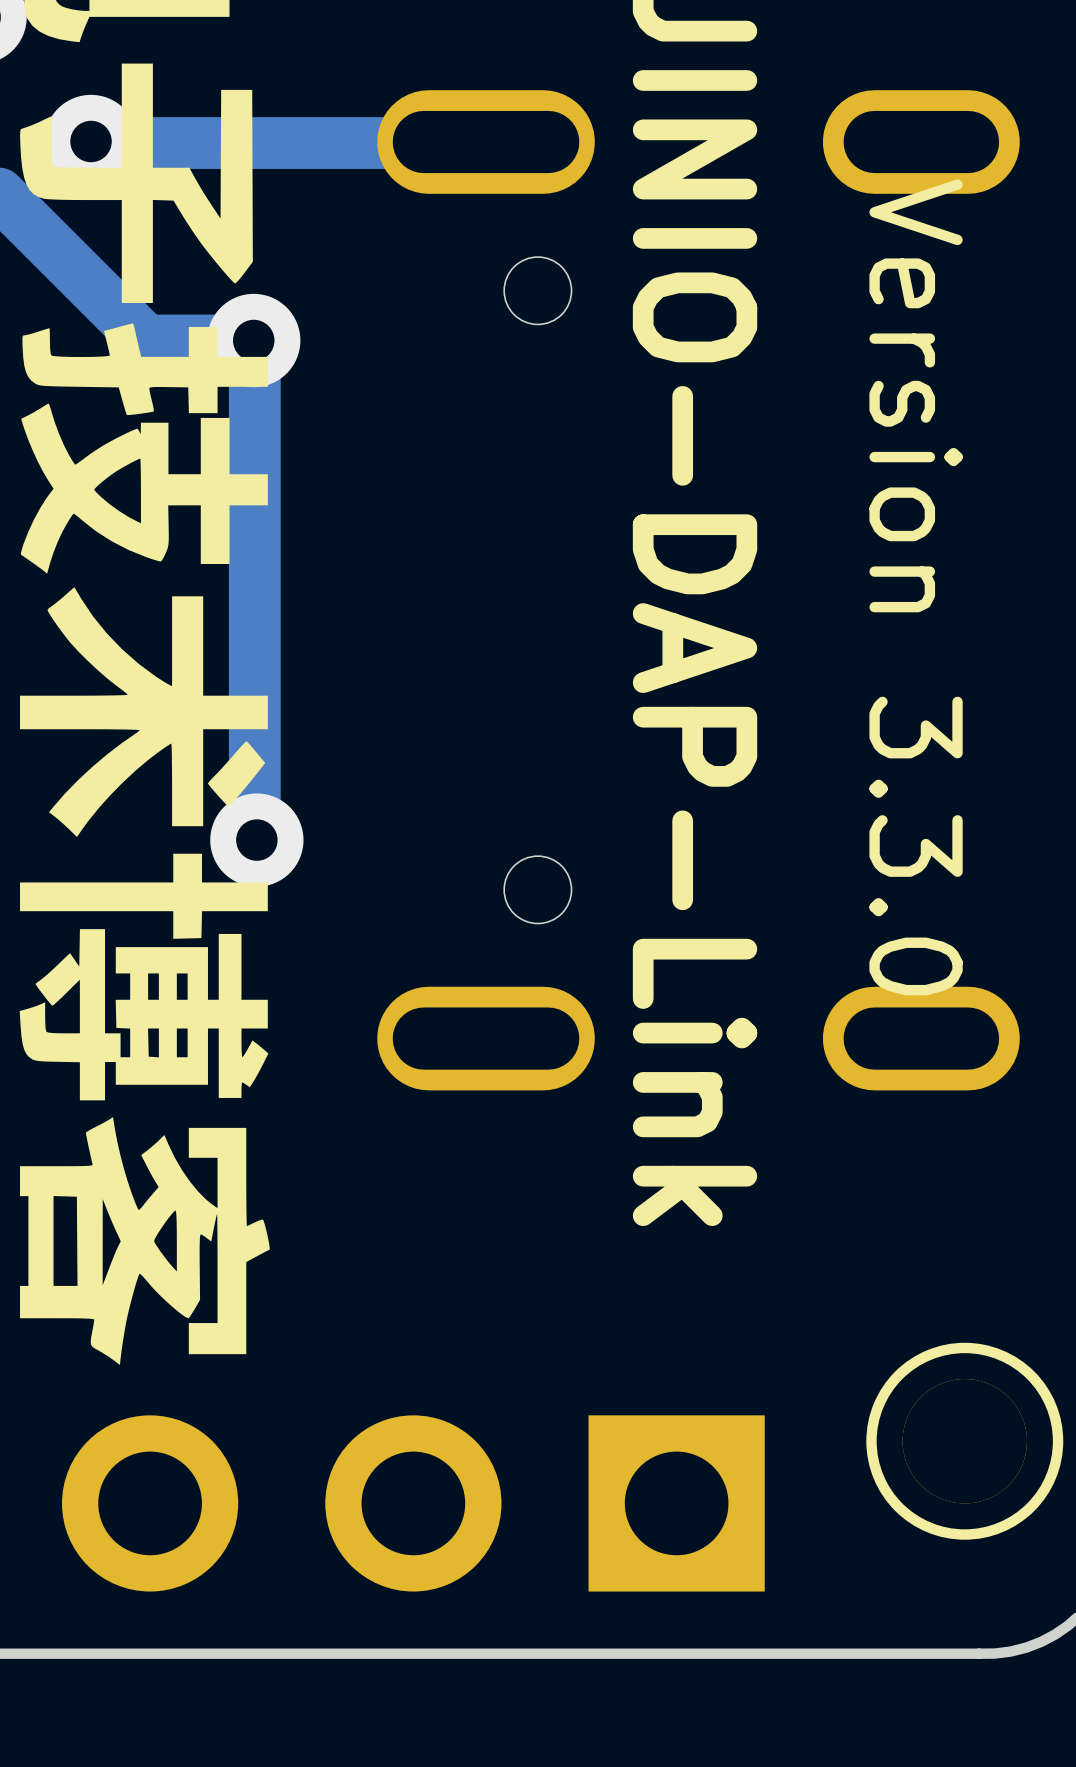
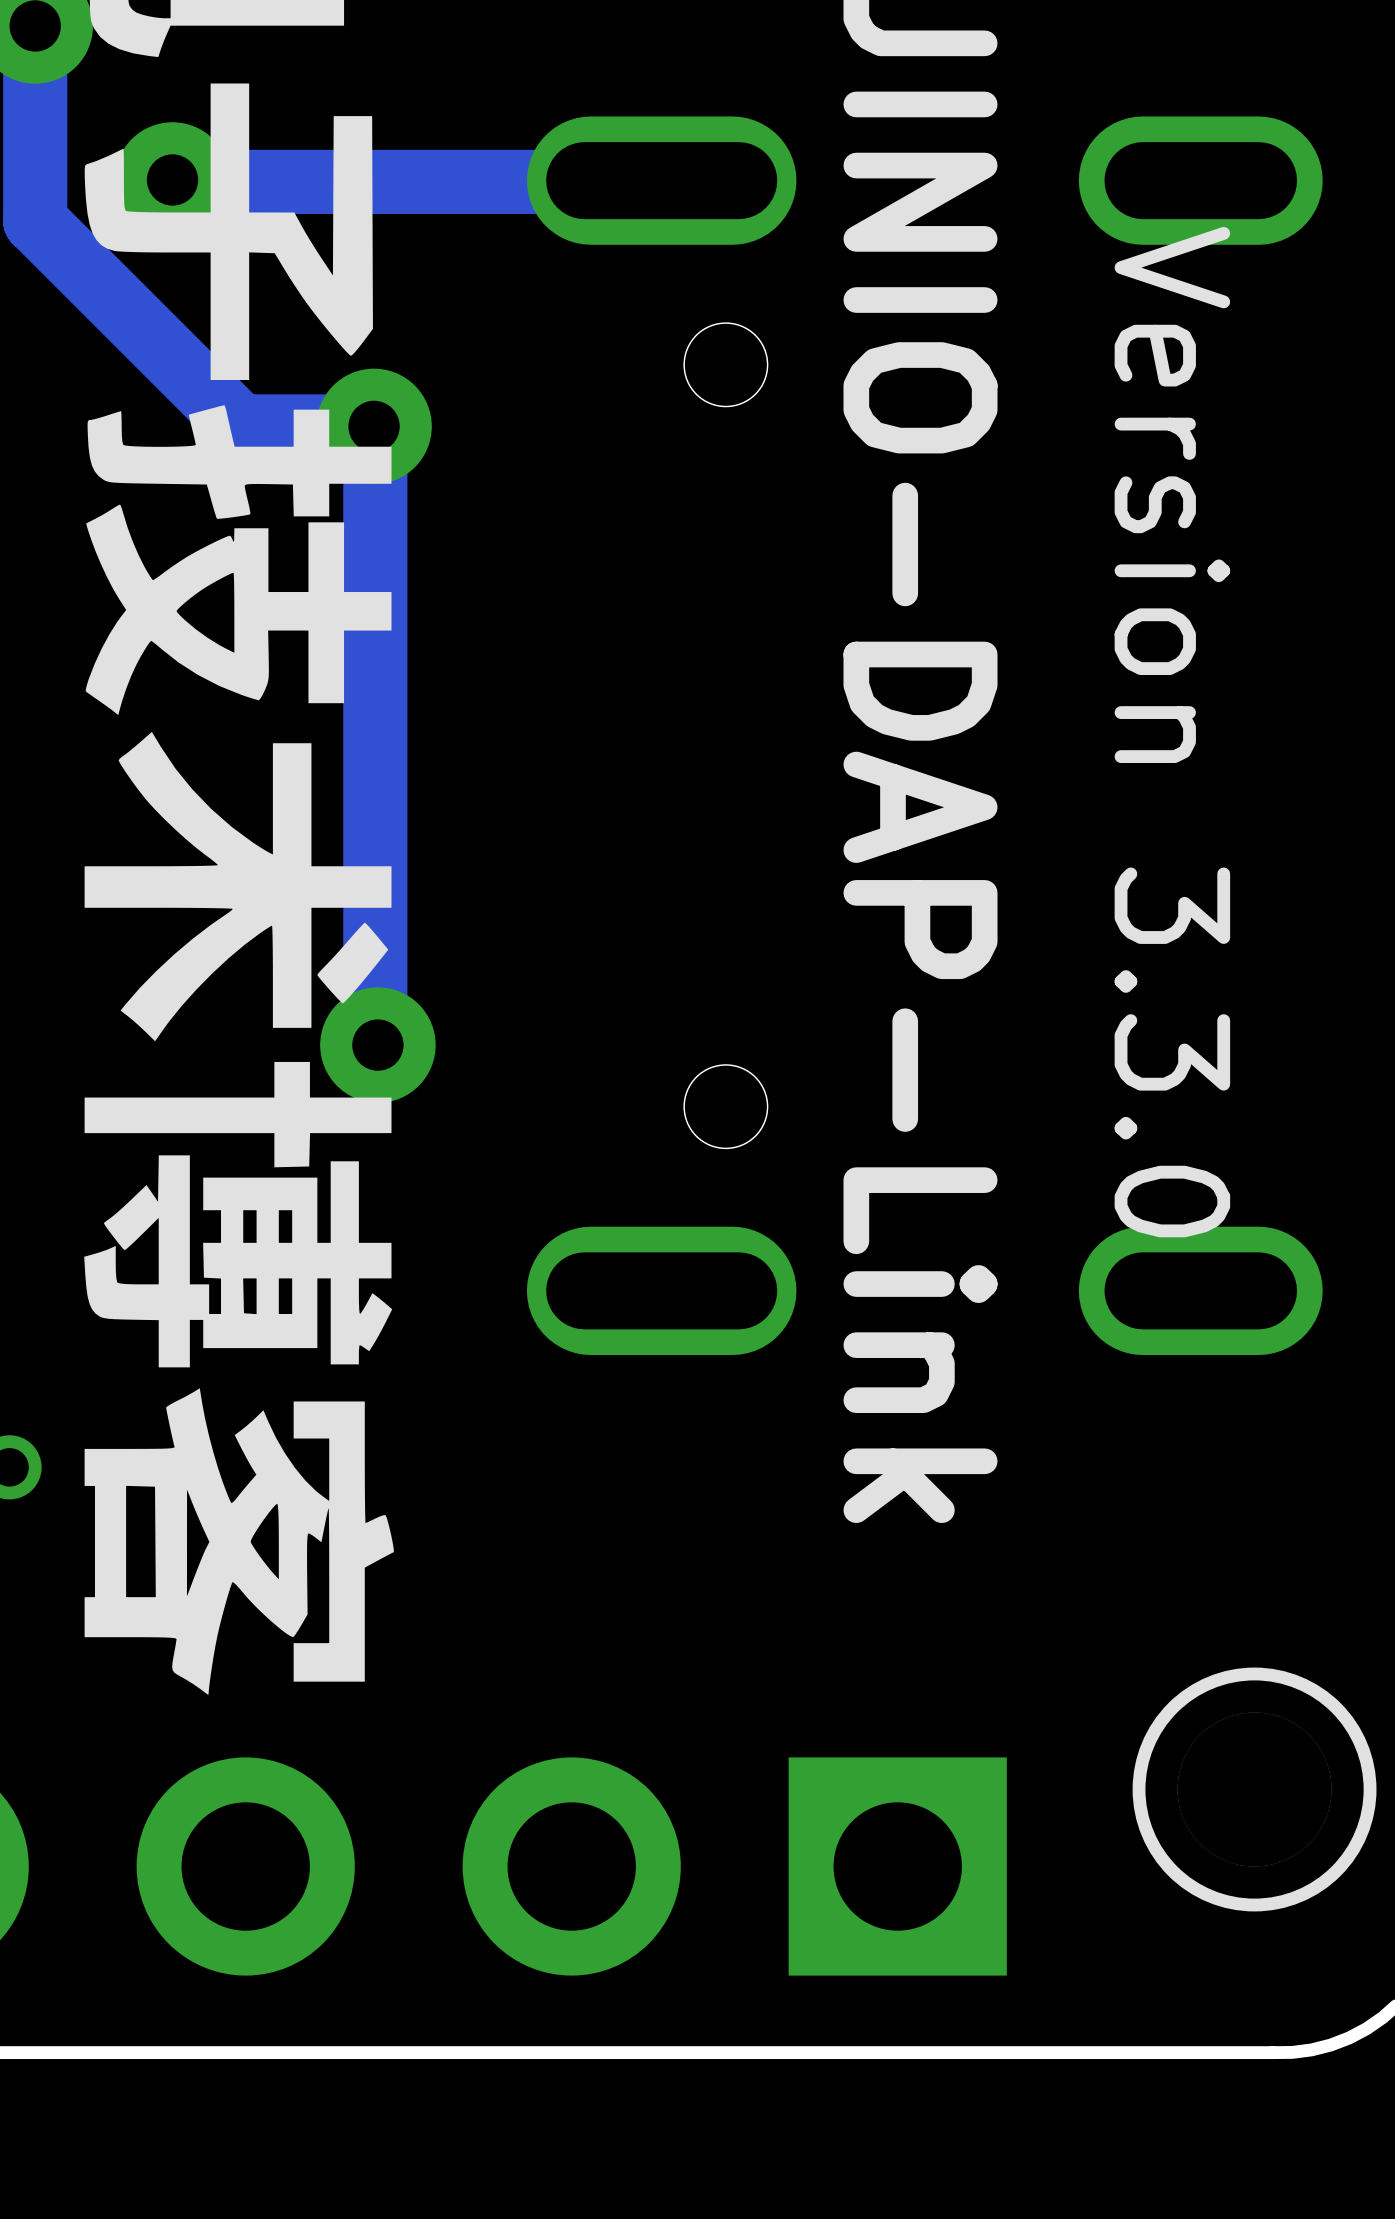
text position: Version 3.3.0 (916, 587) -> Version 3.3.0 (1172, 732)

